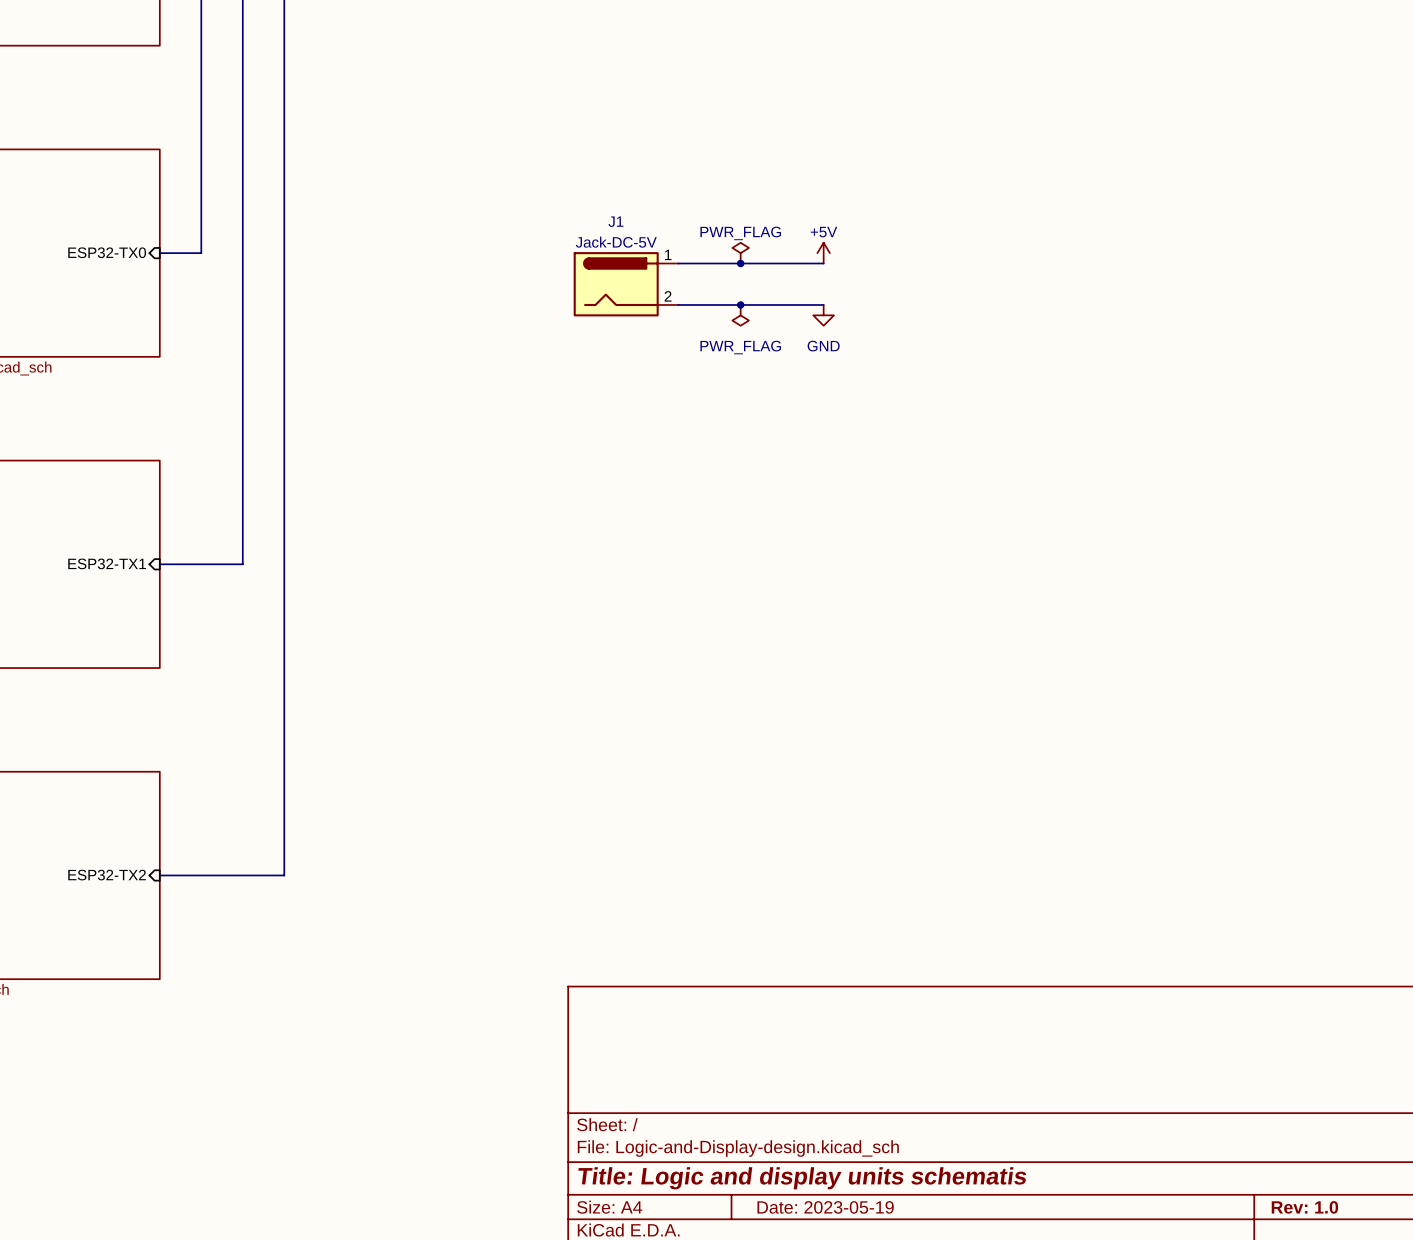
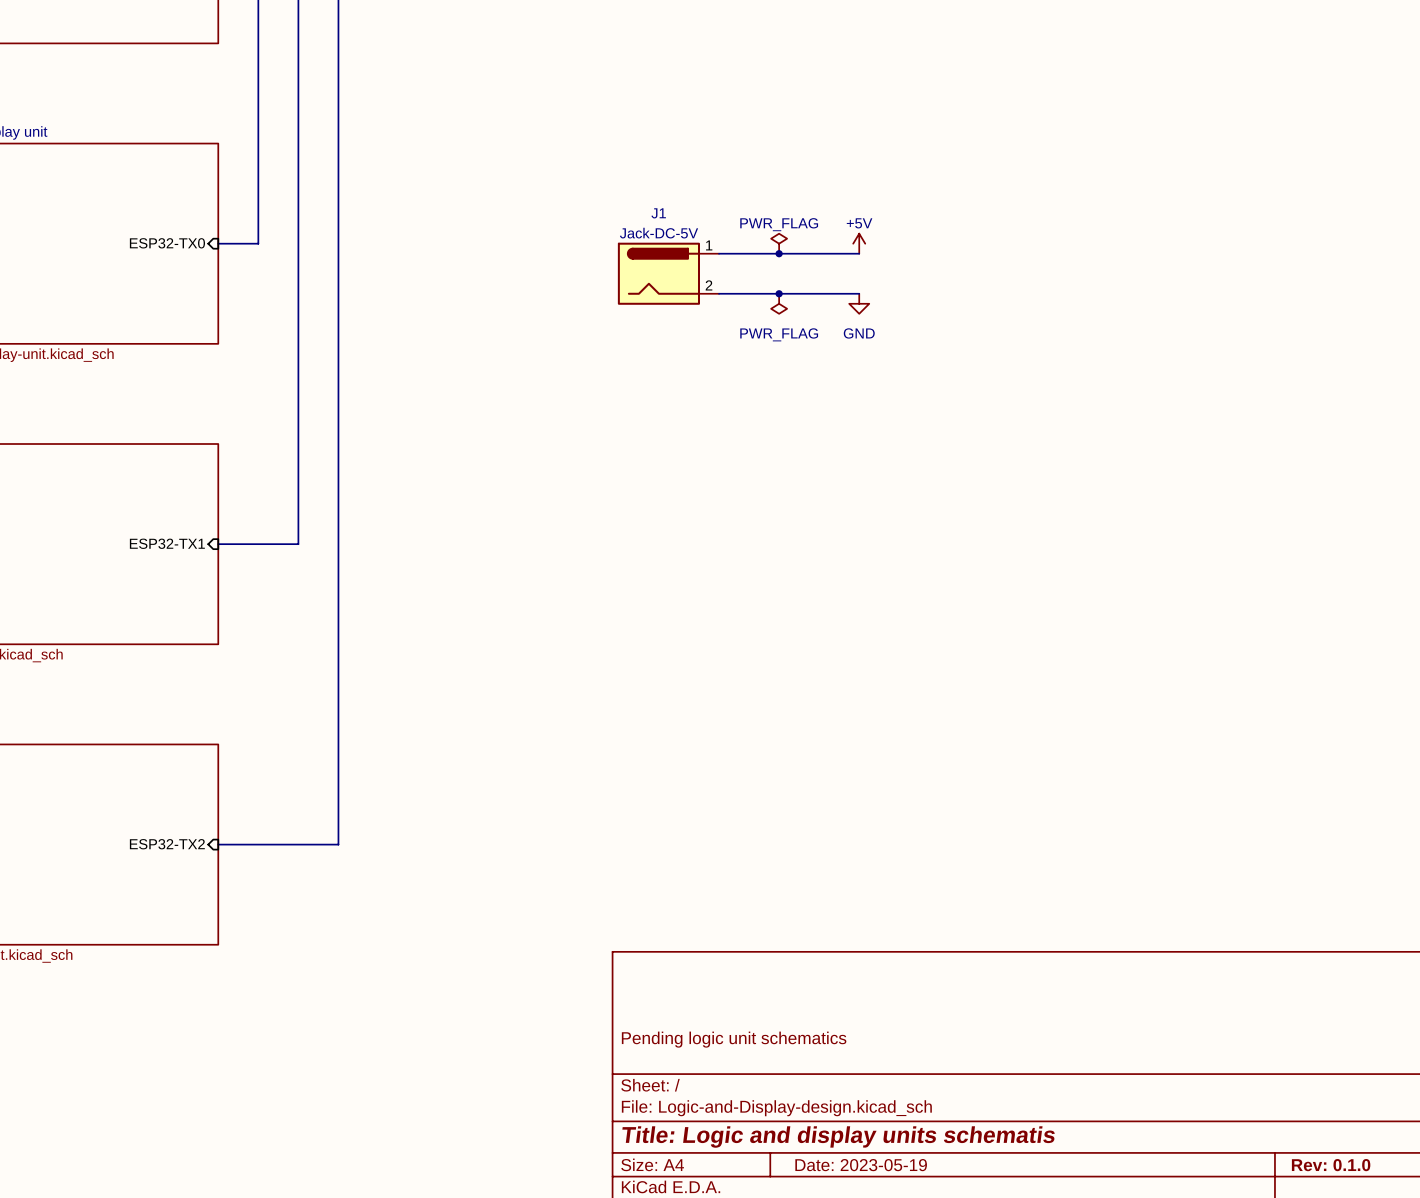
title block: none -> Pending logic unit schematics (734, 1039)
title block: Rev: 1.0 (1304, 1207) -> Rev: 0.1.0 (1331, 1165)

